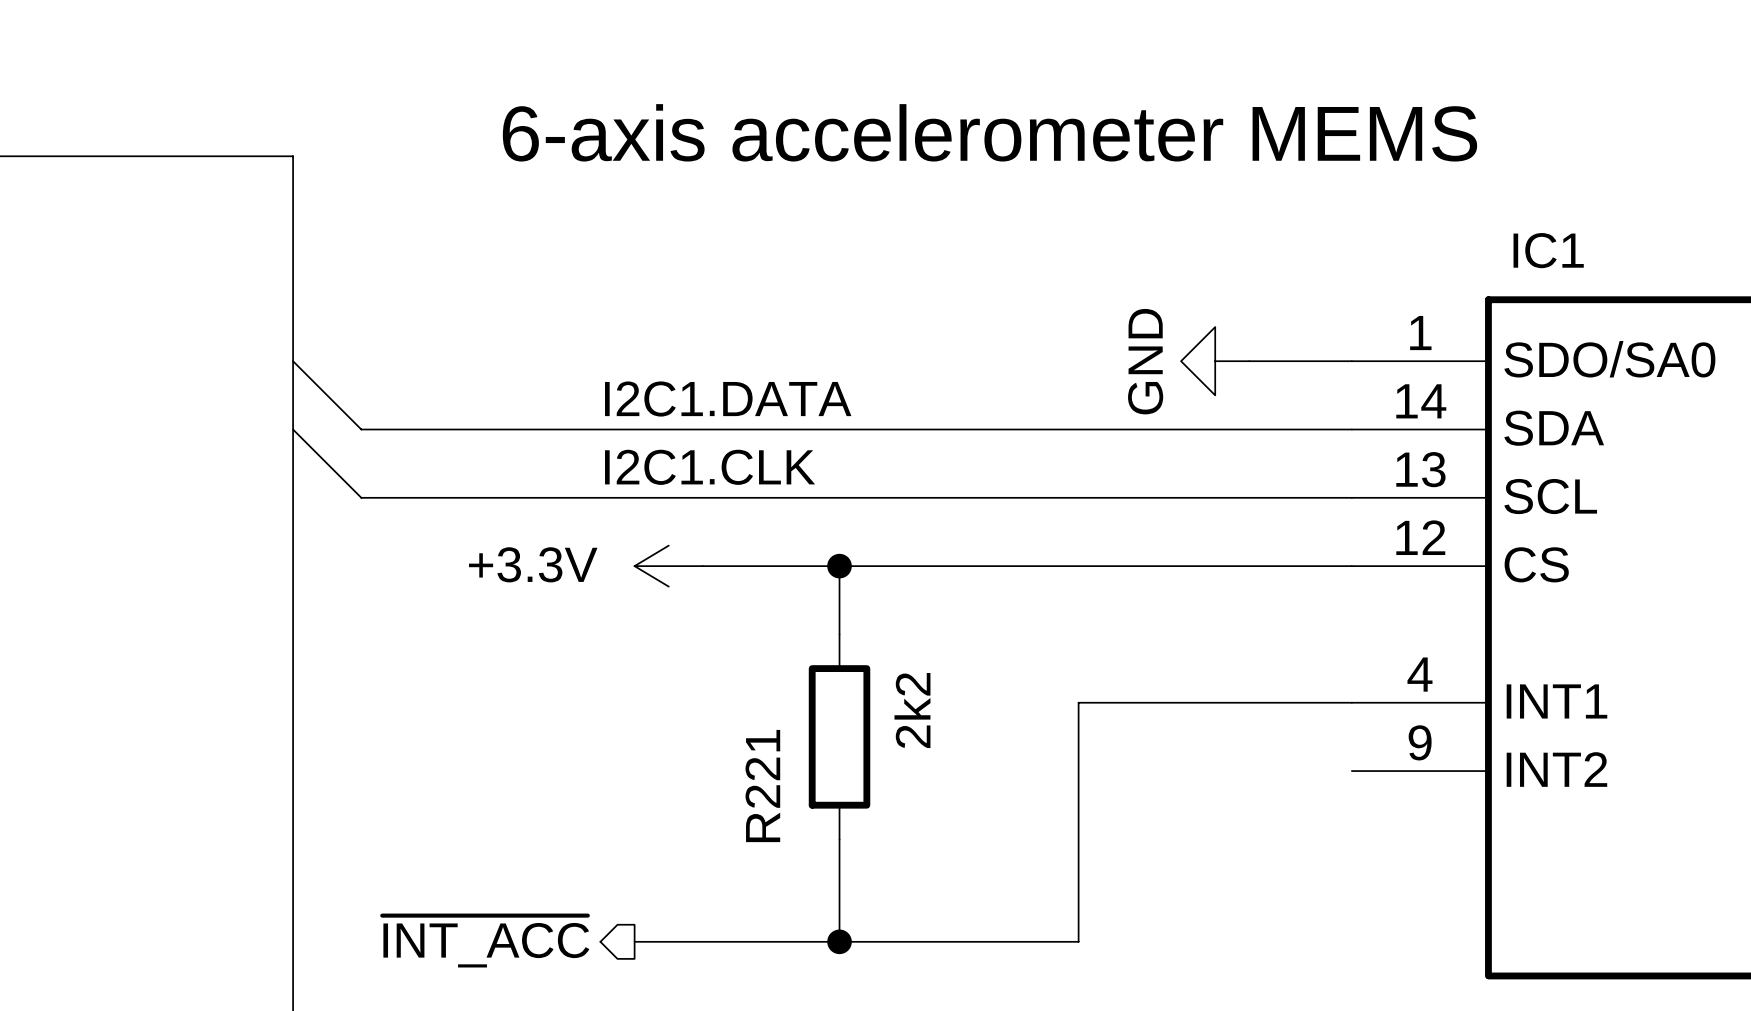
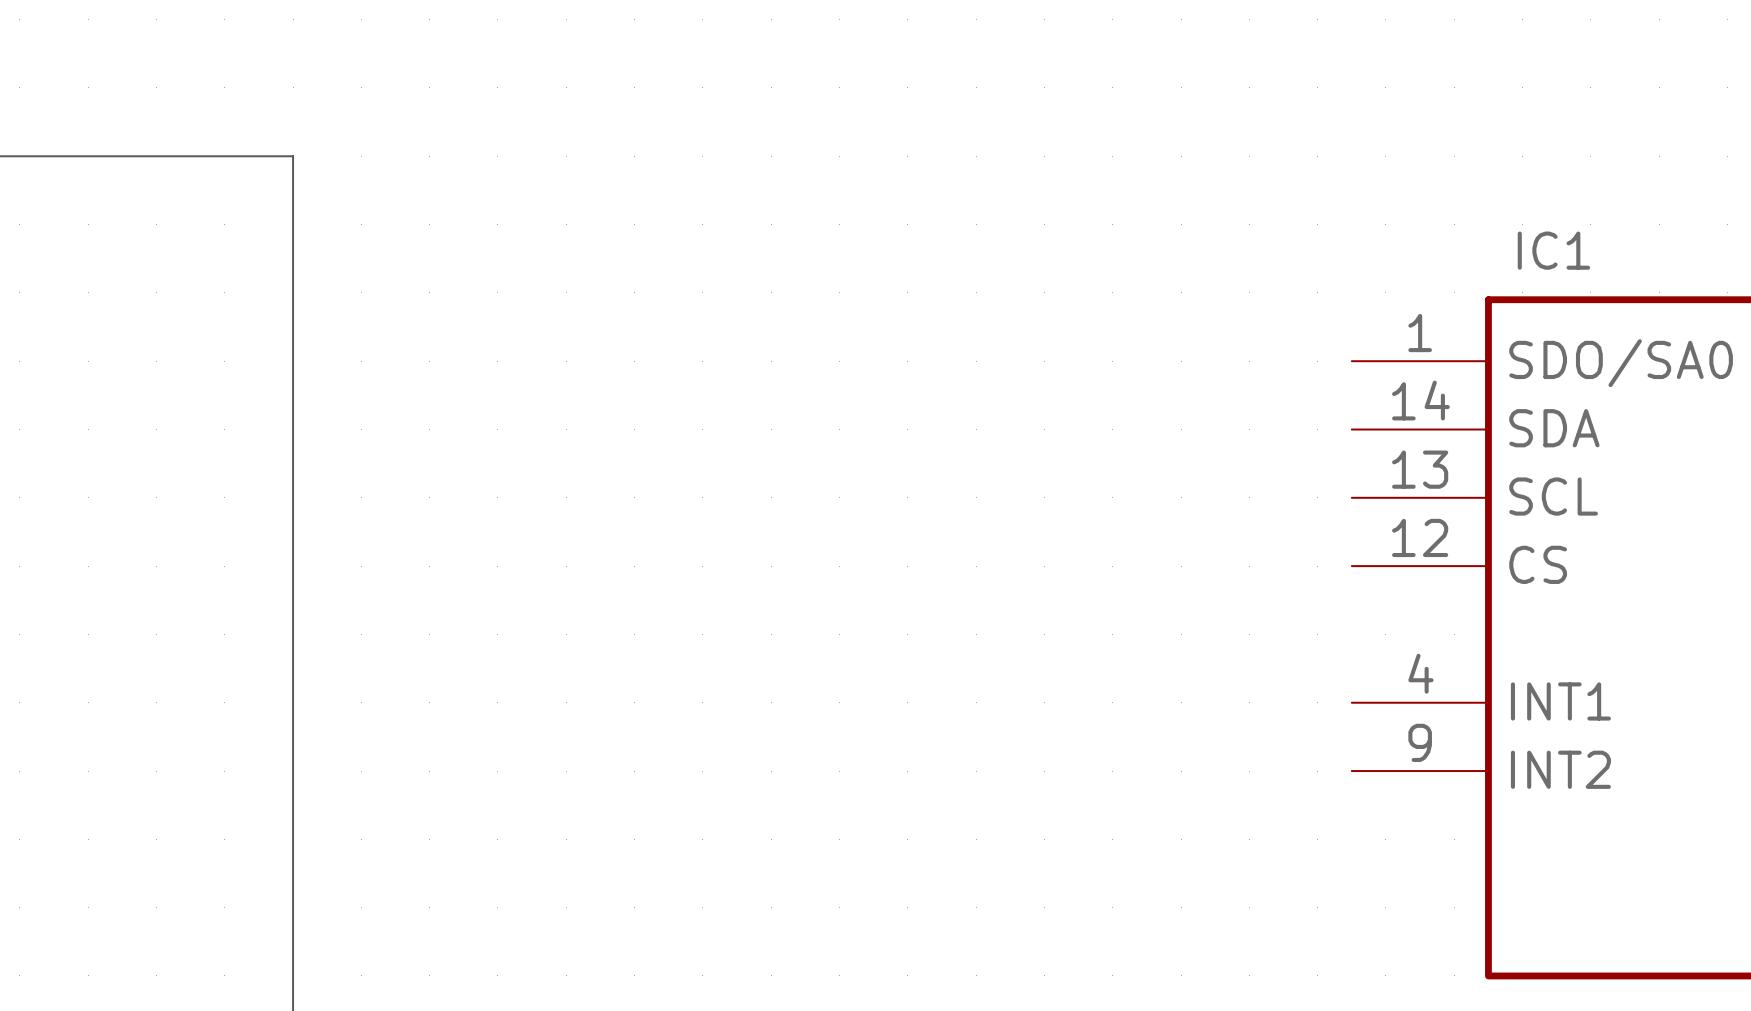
text: 6-axis accelerometer MEMS (989, 132) -> none
wire: (293, 361) (361, 429) (1351, 429) -> none
power symbol: GND (1215, 361) -> none
wire: (1249, 361) (1351, 361) -> none
label: I2C1.DATA (728, 399) -> none
wire: (293, 429) (361, 497) (1351, 497) -> none
label: I2C1.CLK (710, 467) -> none
power symbol: +3.3V (668, 566) -> none
wire: (702, 566) (1351, 566) -> none
wire: (839, 566) (839, 634) -> none
junction: (839, 566) -> none
wire: (1351, 702) (1078, 702) (1078, 941) (634, 941) -> none
R221: 2k2 (839, 736) -> none
wire: (839, 839) (839, 941) -> none
hierarchical label: ~{INT_ACC} (485, 941) -> none
junction: (839, 941) -> none

